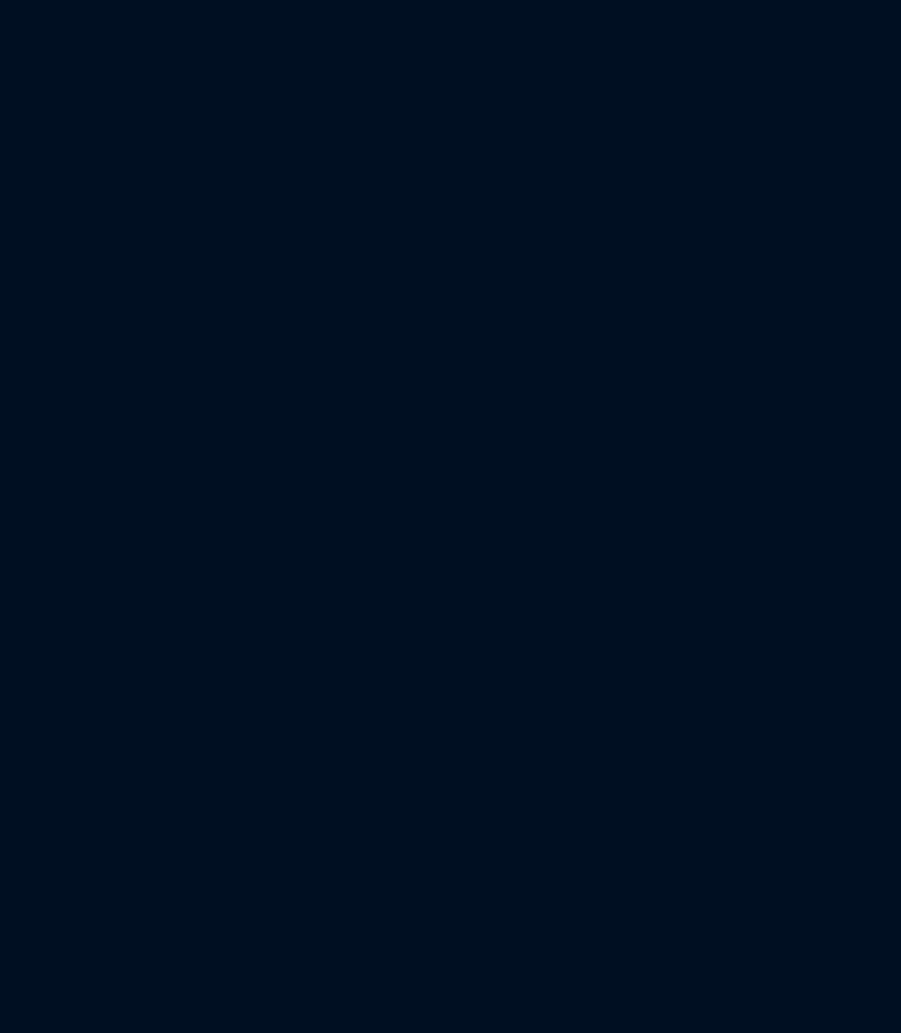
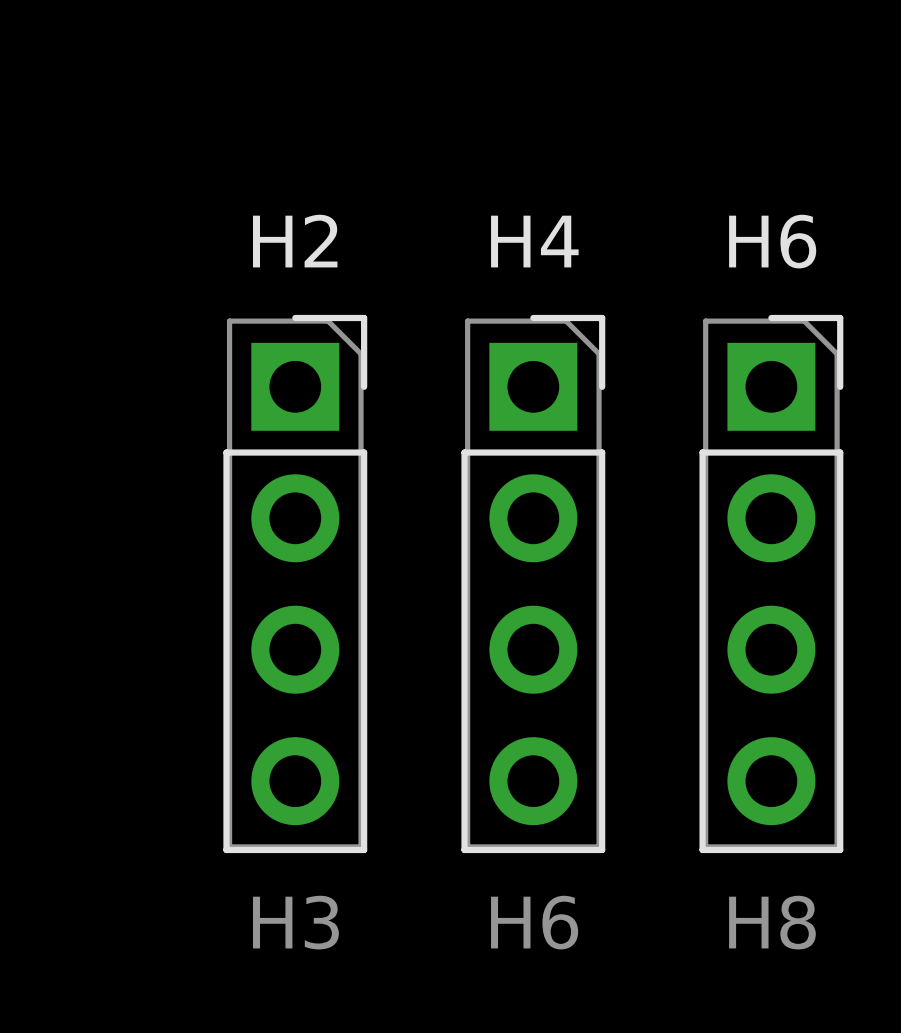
H2: none -> H3 (295, 583)
H4: none -> H6 (533, 583)
H6: none -> H8 (771, 583)

